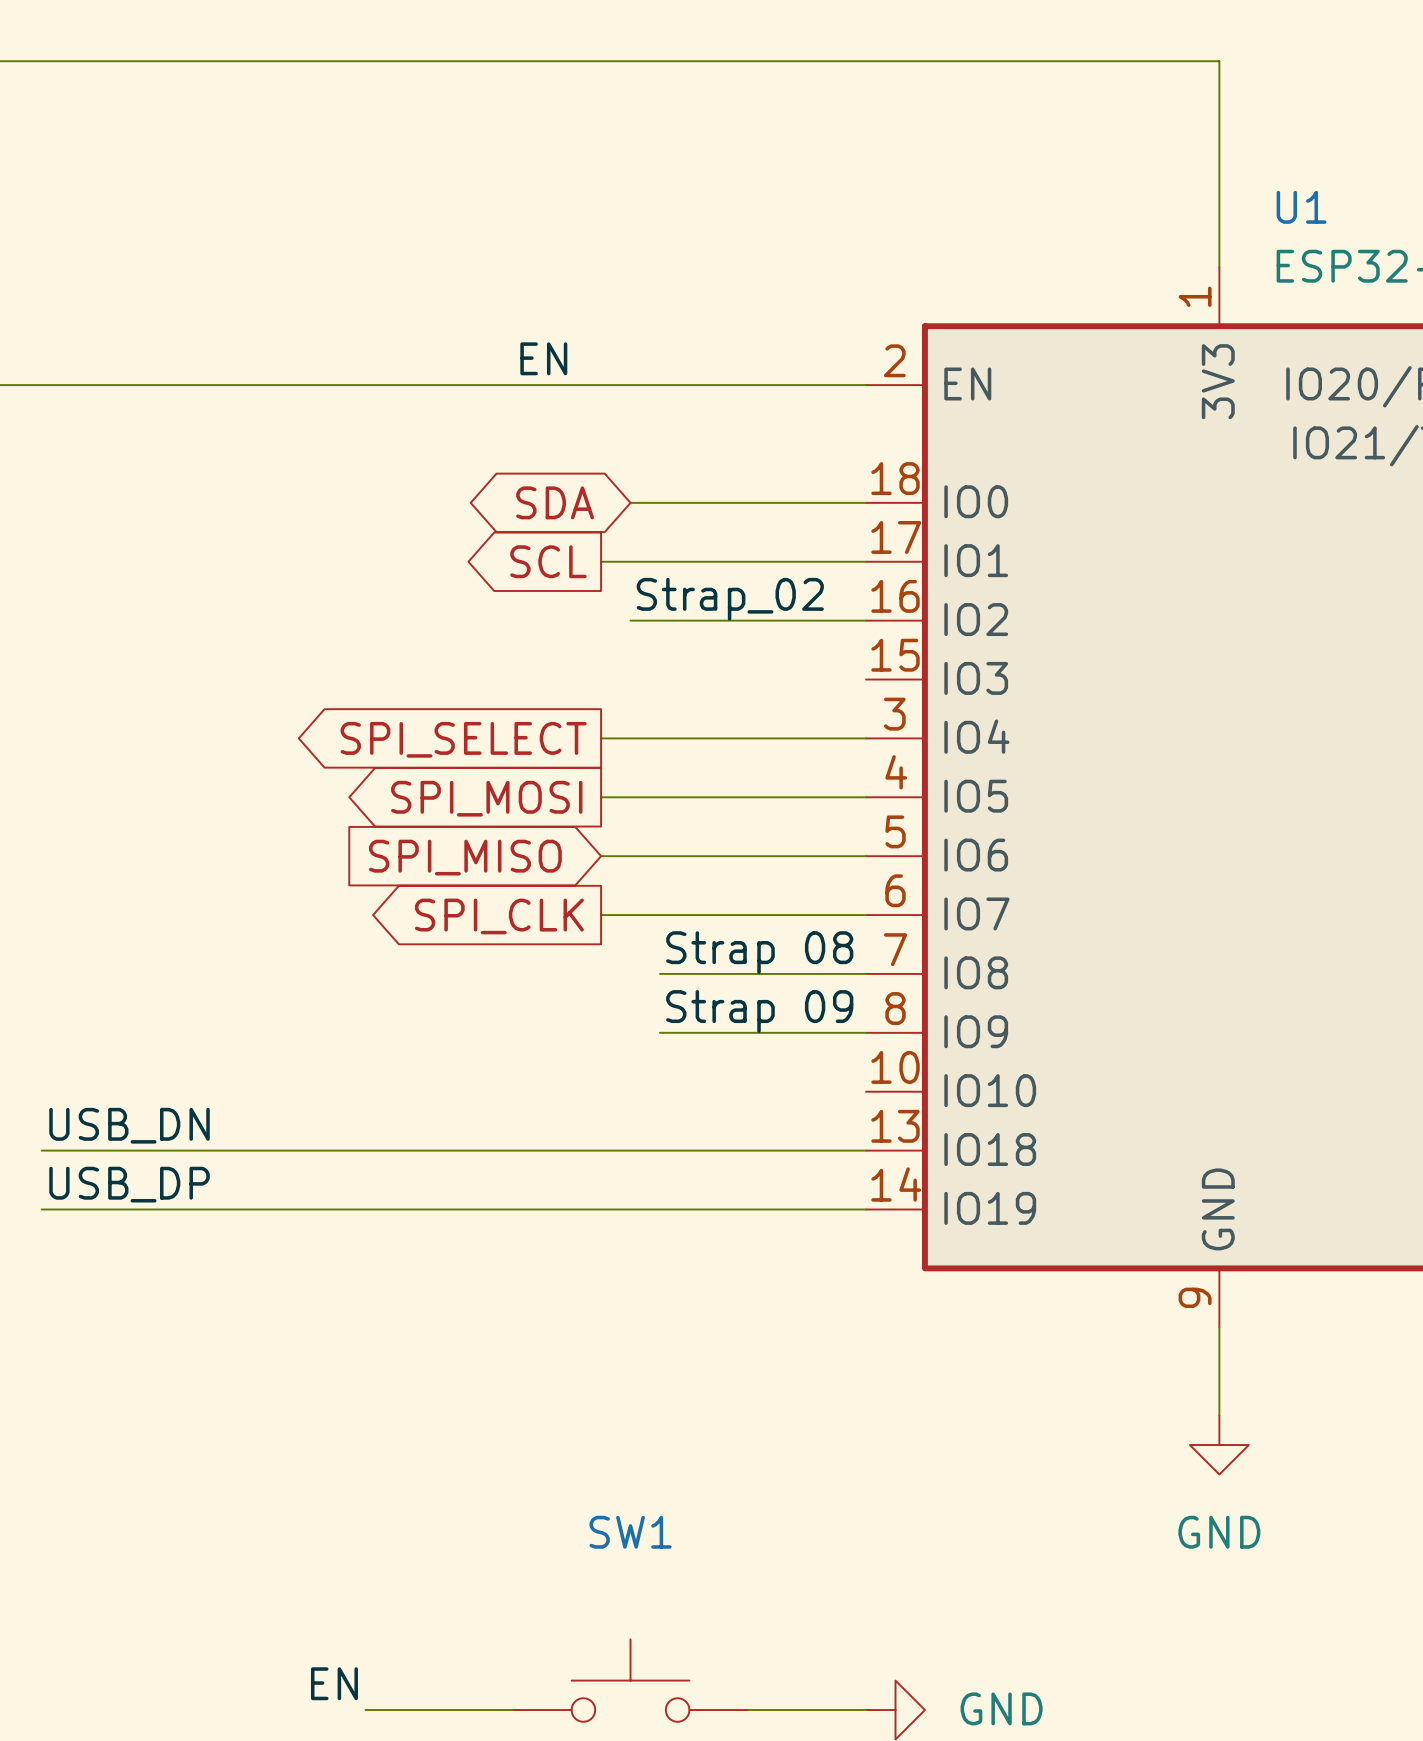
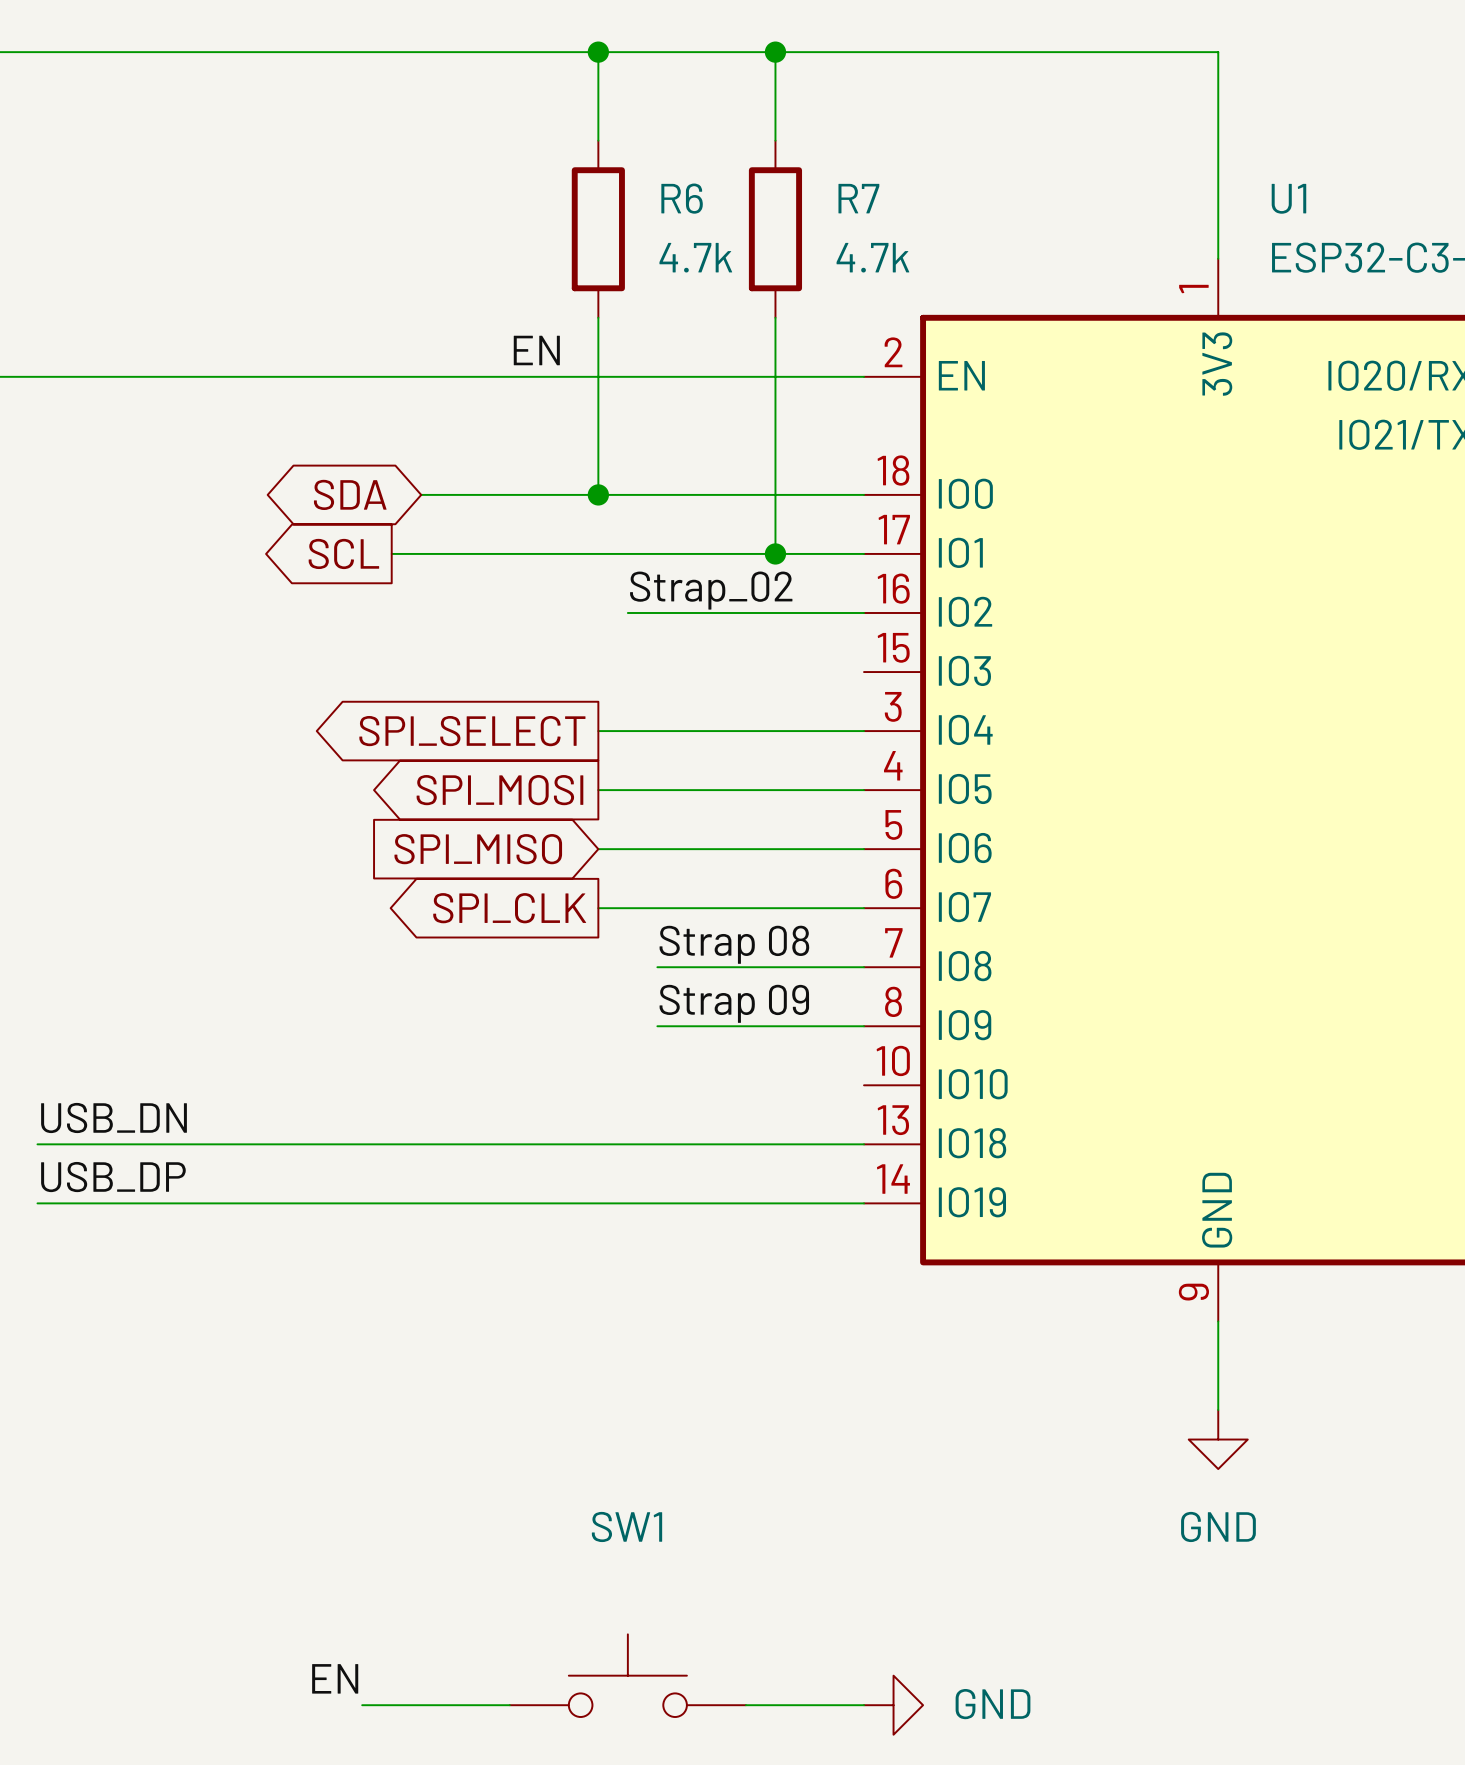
wire: none -> (598, 52) (598, 140)
junction: none -> (598, 52)
wire: none -> (775, 52) (775, 140)
junction: none -> (775, 52)
R6: none -> 4.7k (598, 229)
R7: none -> 4.7k (775, 229)
wire: none -> (598, 317) (598, 494)
wire: none -> (775, 317) (775, 553)
wire: none -> (421, 494) (627, 494)
global label position: SDA (555, 502) -> SDA (350, 494)
junction: none -> (598, 494)
wire: none -> (391, 553) (598, 553)
global label position: SCL (548, 561) -> SCL (343, 553)
junction: none -> (775, 553)

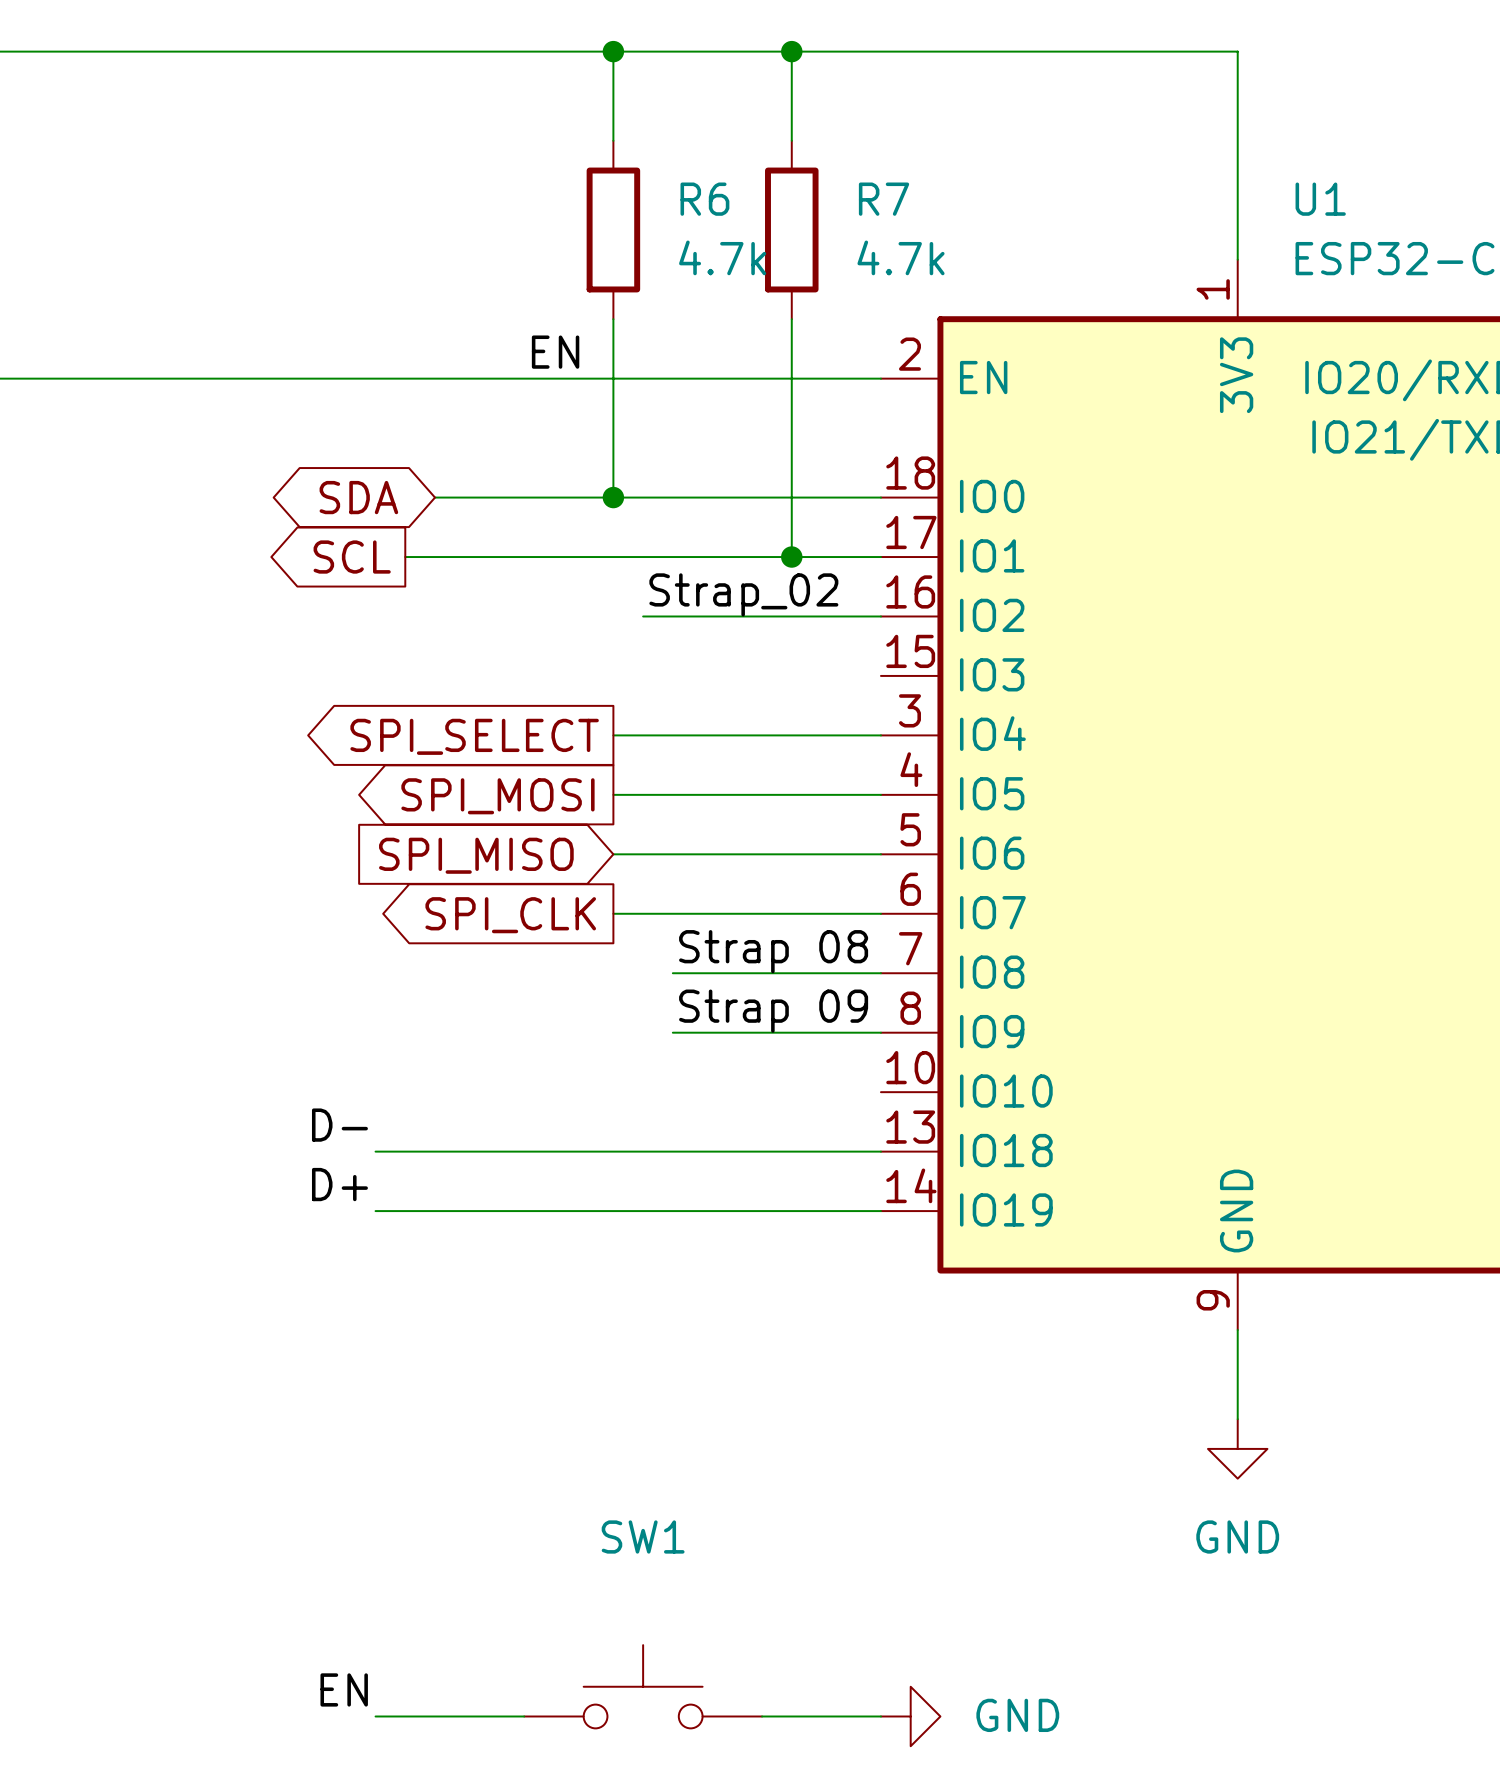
label: USB_DN (114, 1117) -> none
label: none -> D- (339, 1125)
wire: (37, 1144) (362, 1144) -> none
label: USB_DP (113, 1177) -> none
label: none -> D+ (339, 1184)
wire: (37, 1203) (362, 1203) -> none

